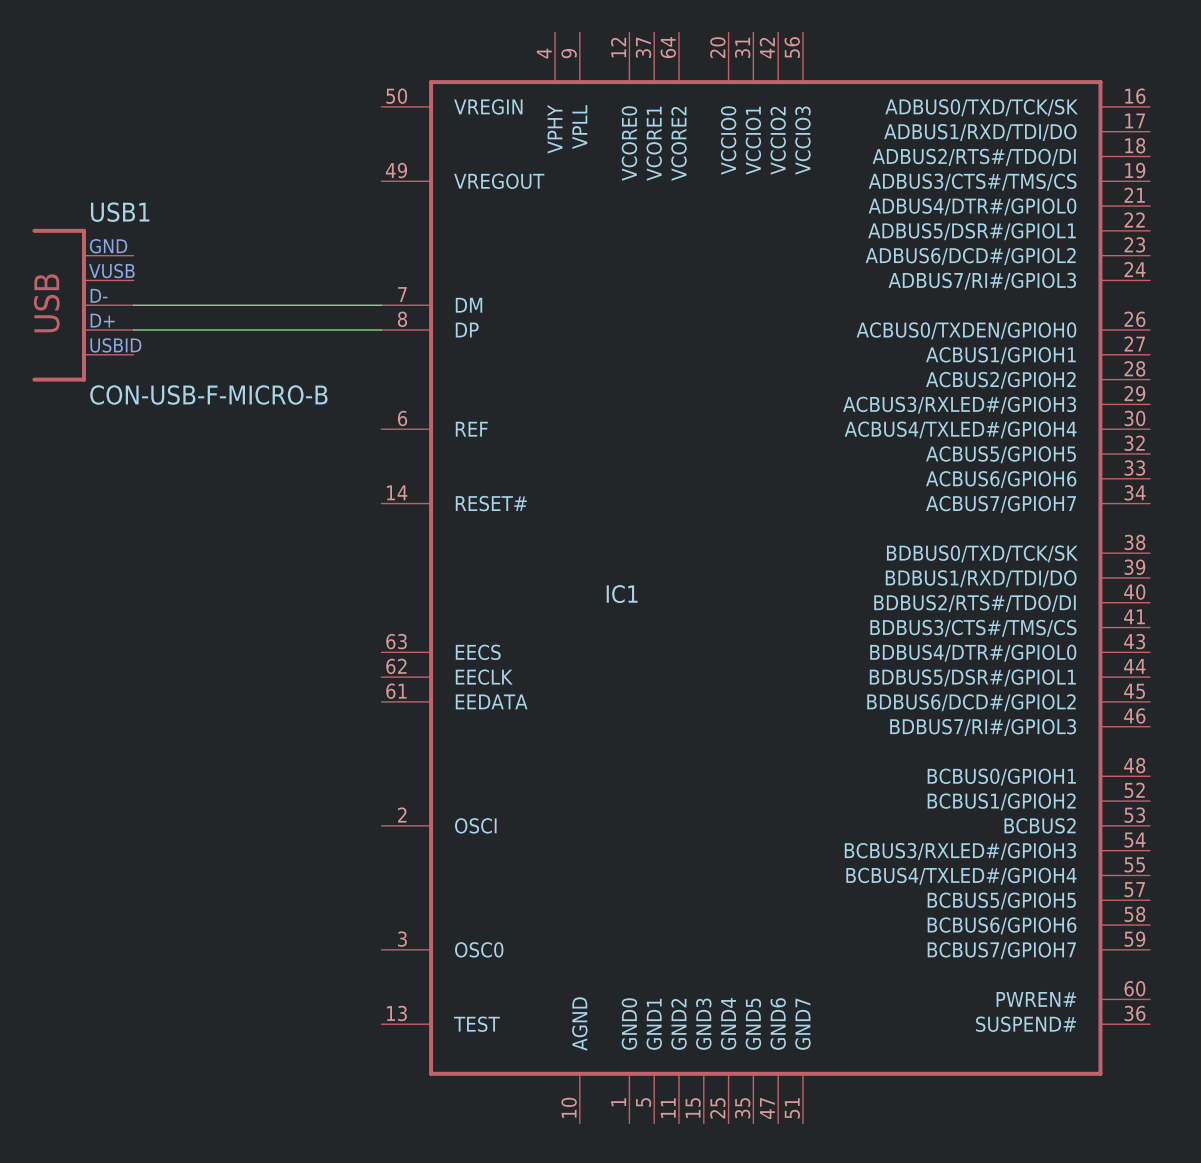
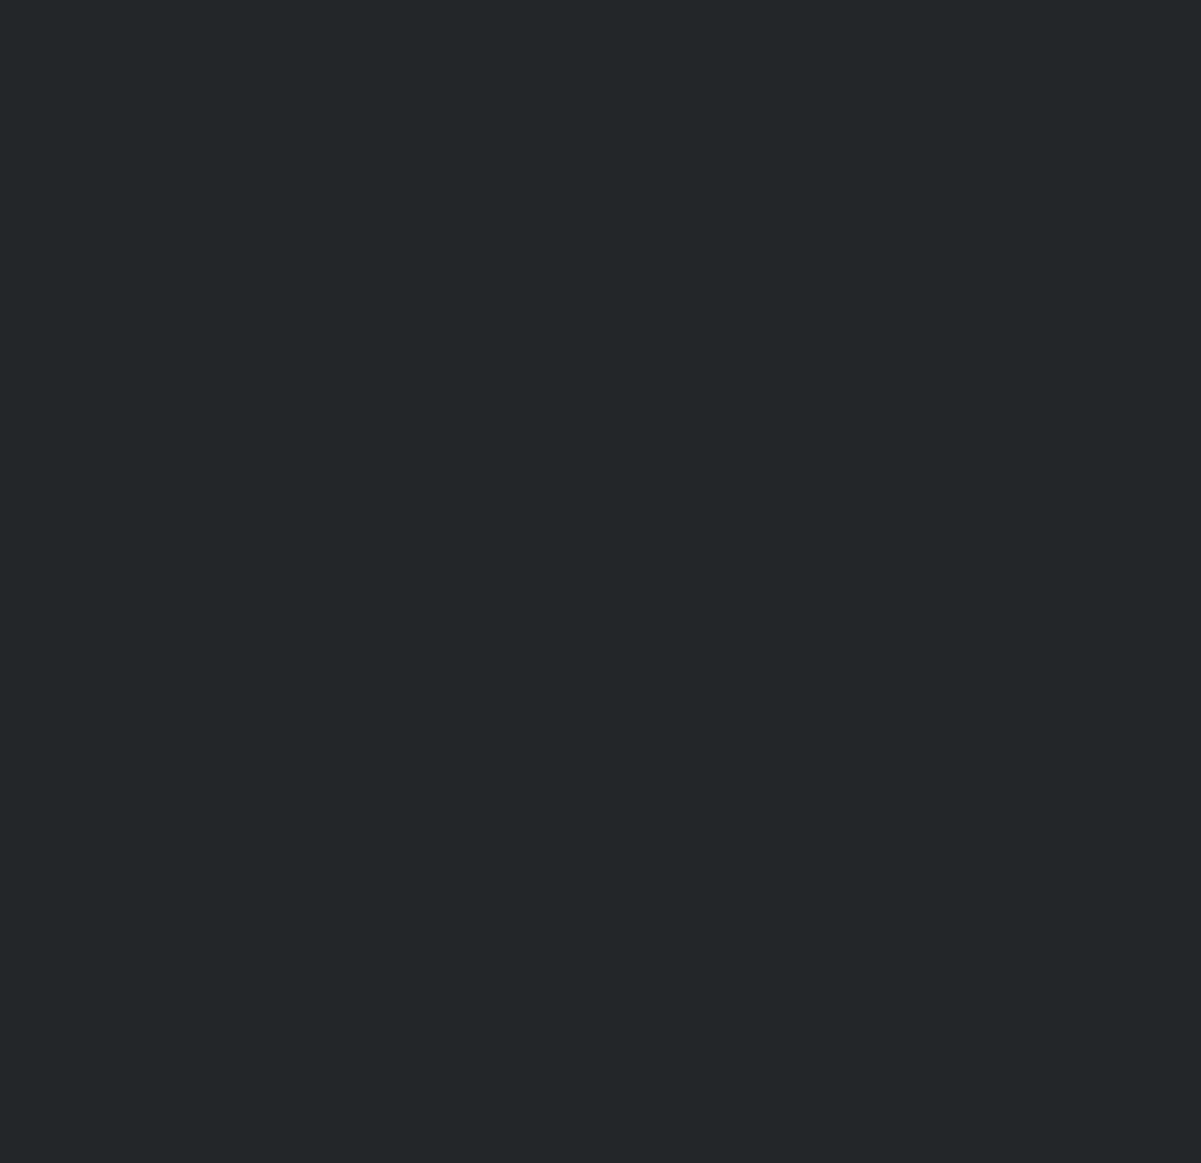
USB1: CON-USB-F-MICRO-B (82, 305) -> none
wire: (133, 305) (381, 305) -> none
wire: (133, 330) (381, 330) -> none
IC1: (765, 577) -> none

